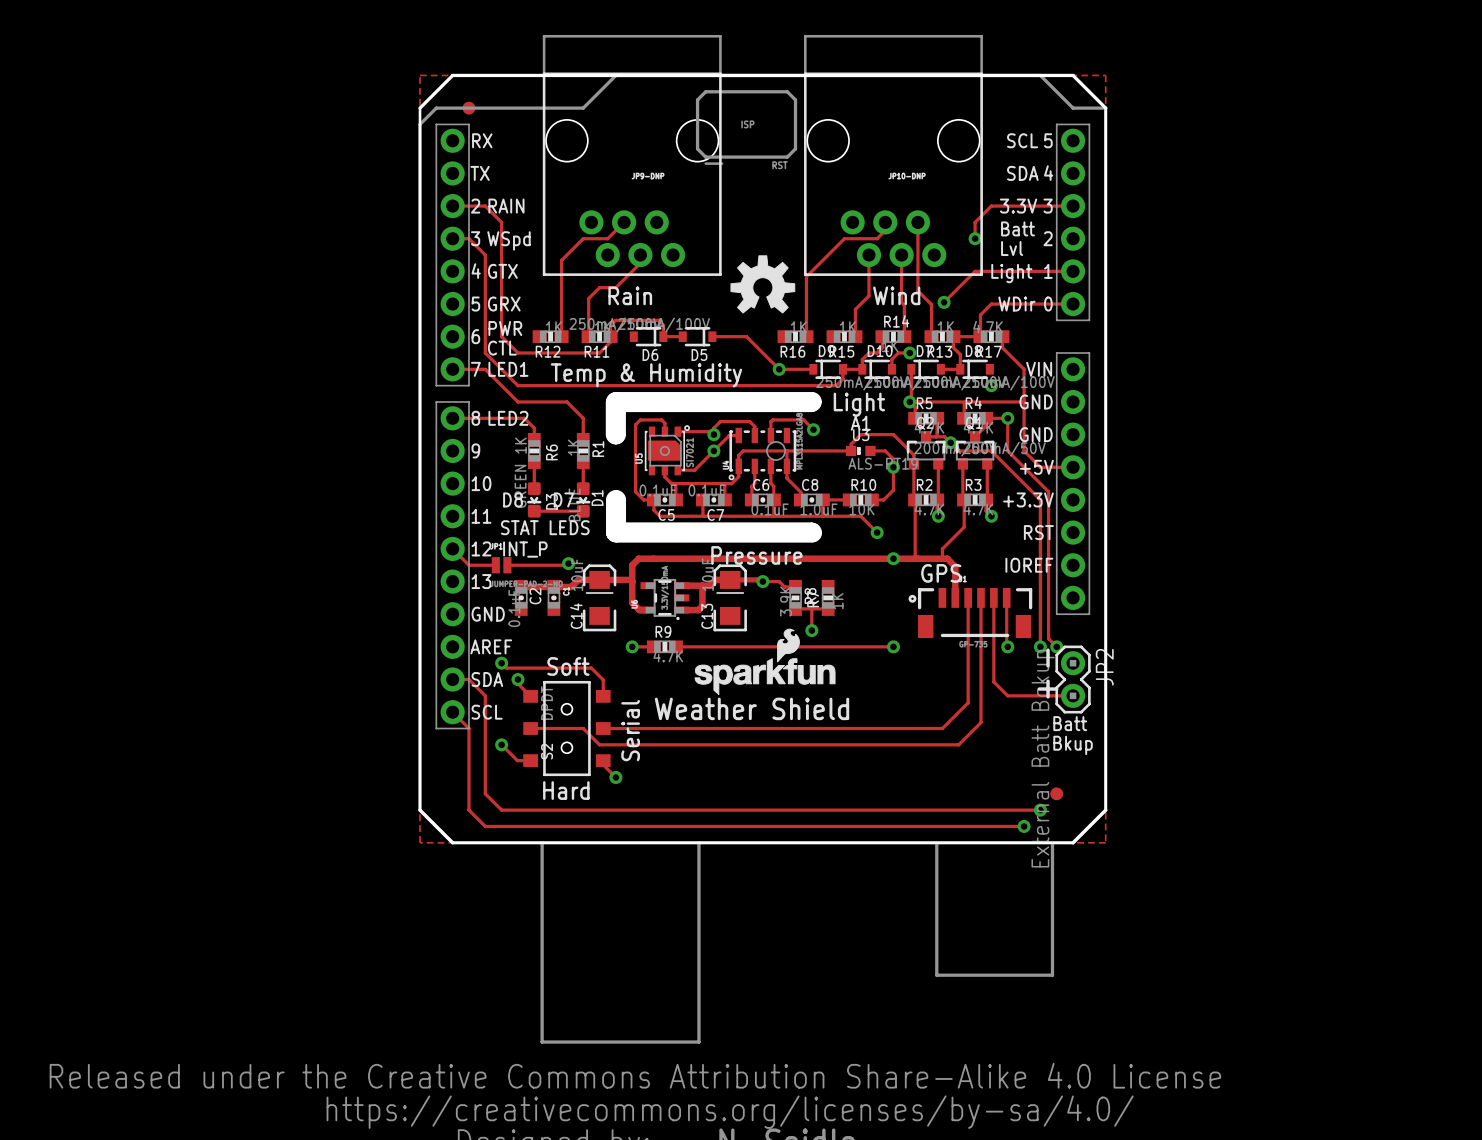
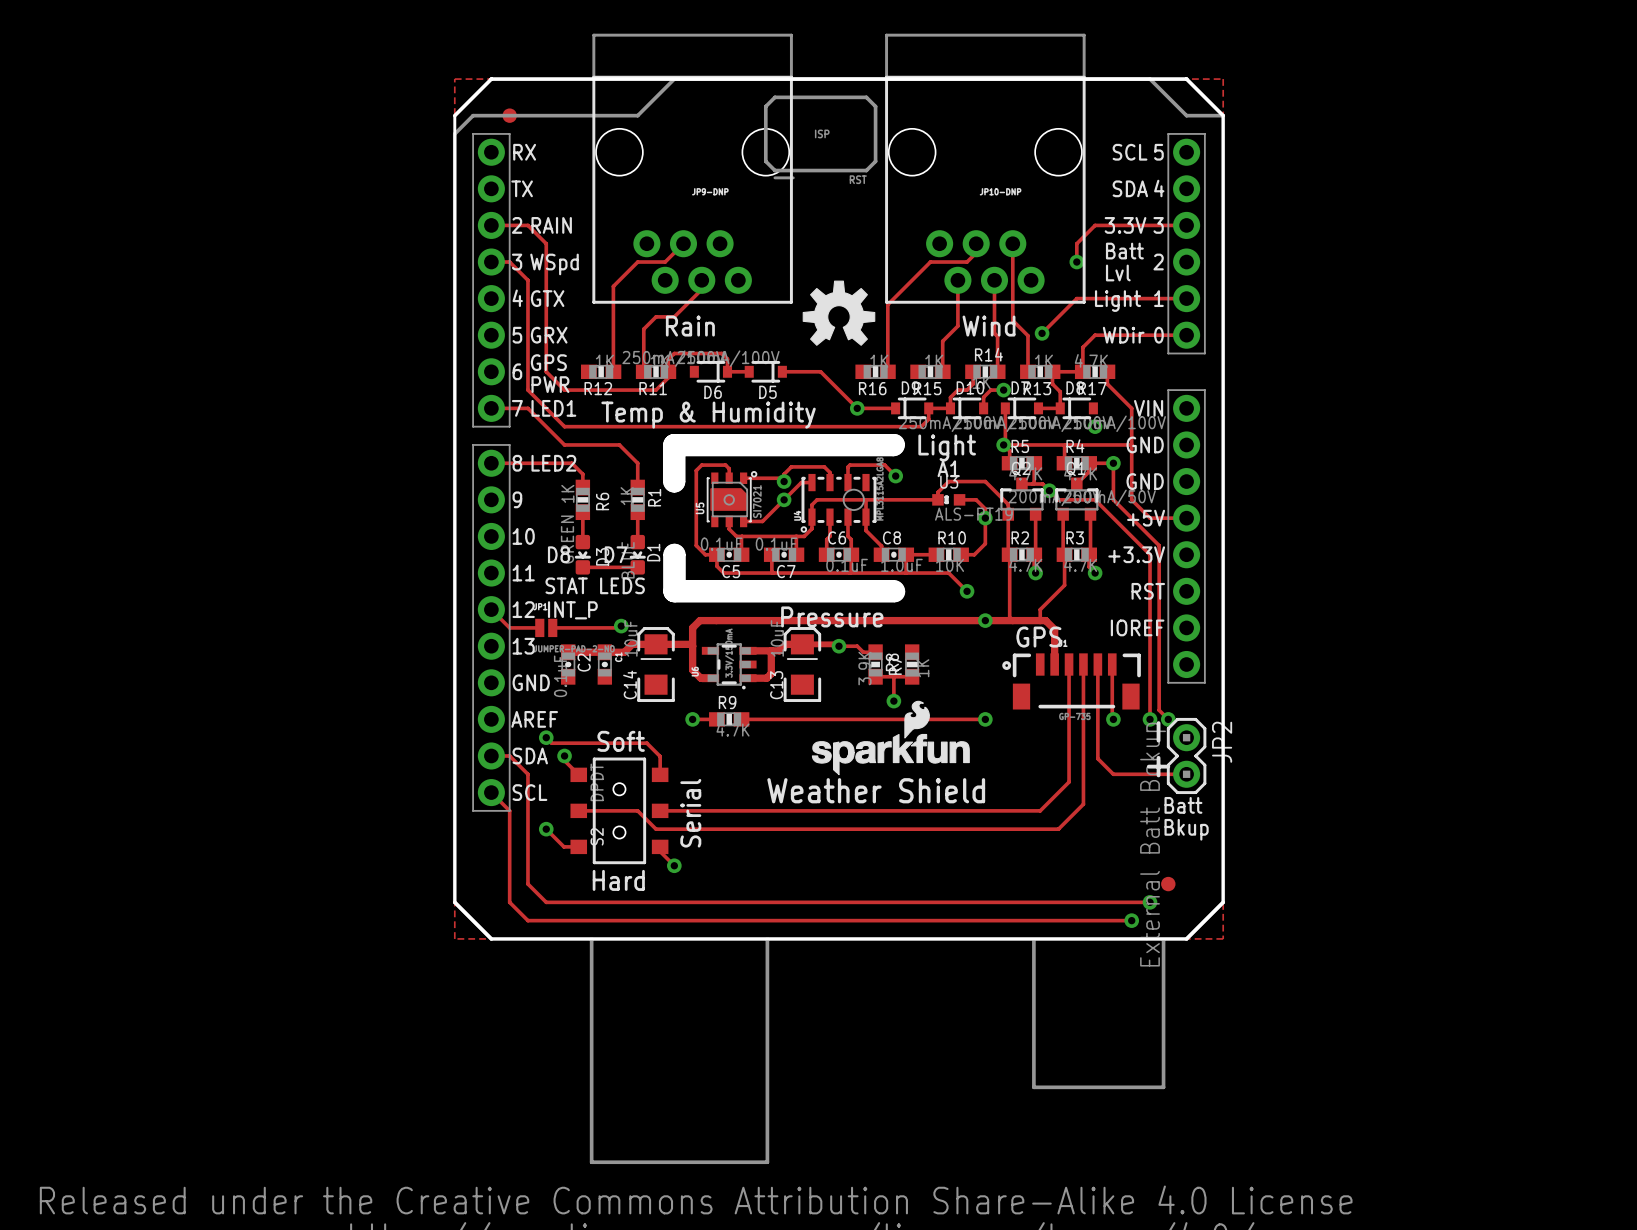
text: PWR (505, 328) -> GPS (548, 362)
text: CTL (502, 348) -> PWR (550, 384)
drawing position: (765, 661) -> (890, 738)
text position: Weather Shield (752, 708) -> Weather Shield (876, 790)

